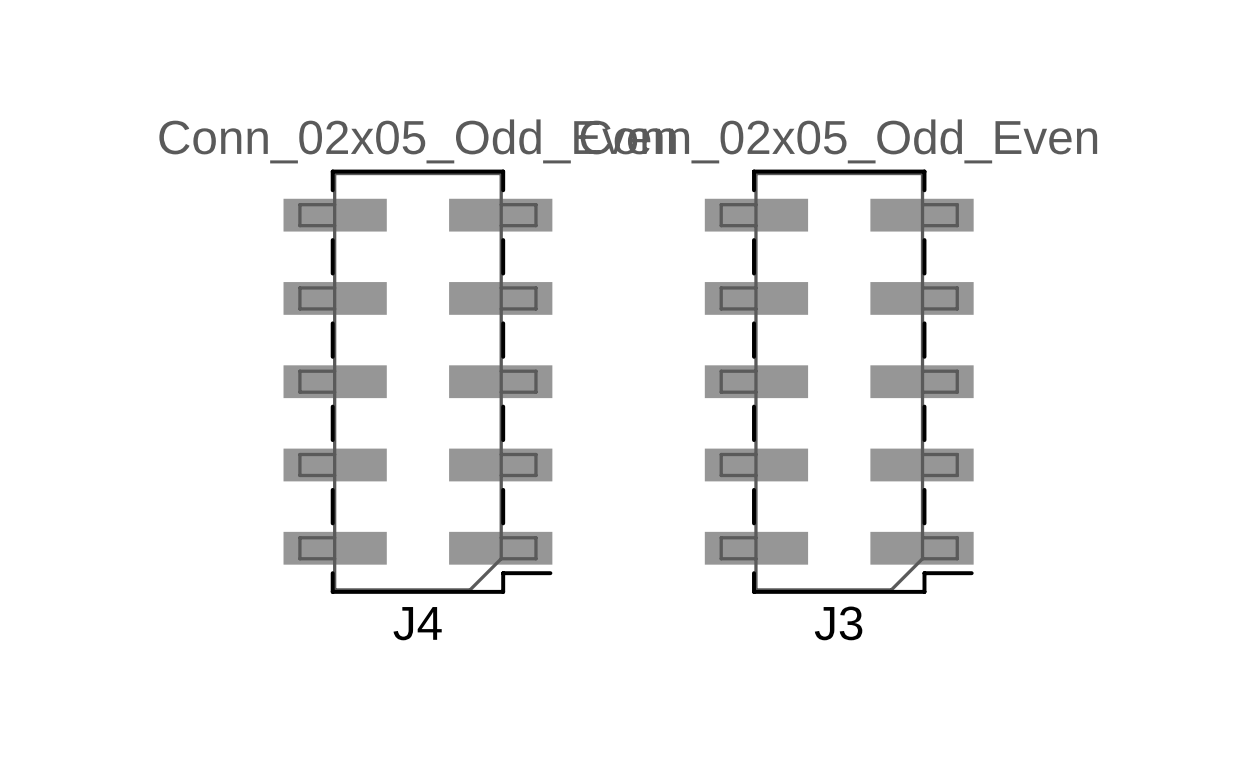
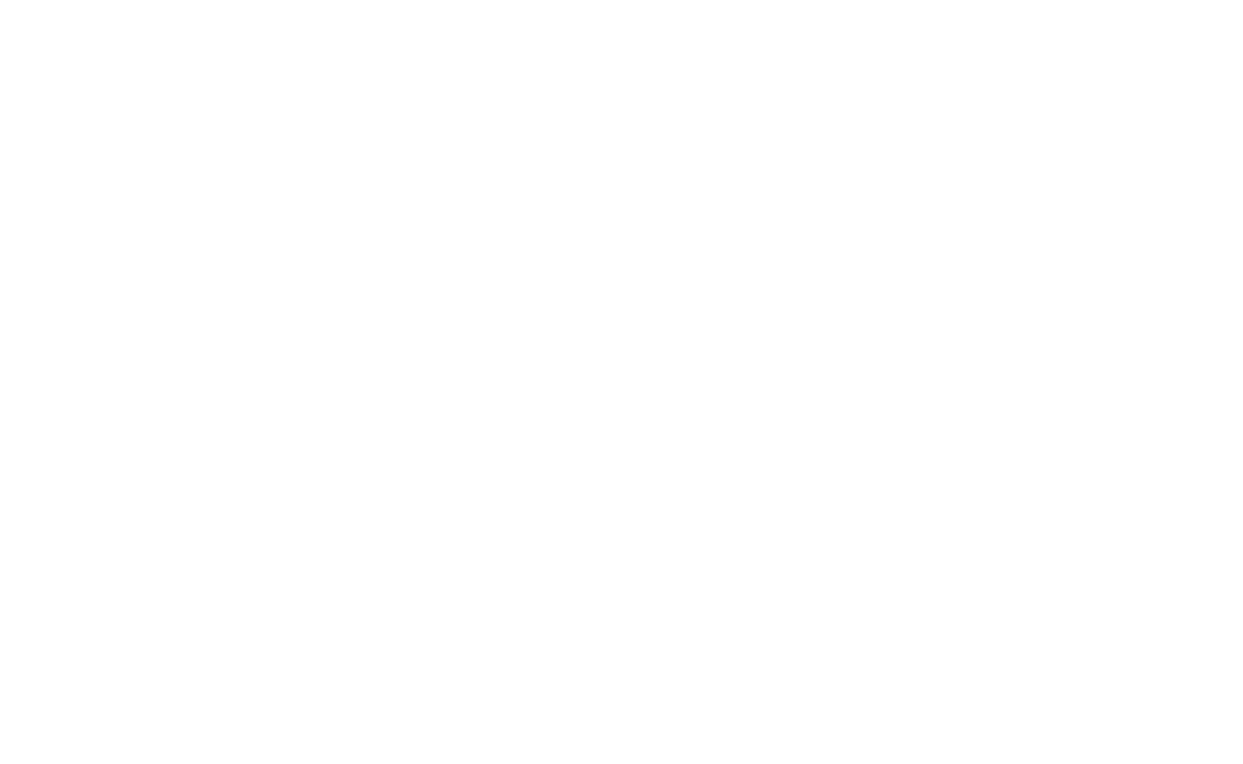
J4: Conn_02x05_Odd_Even (417, 381) -> none
J3: Conn_02x05_Odd_Even (839, 381) -> none

